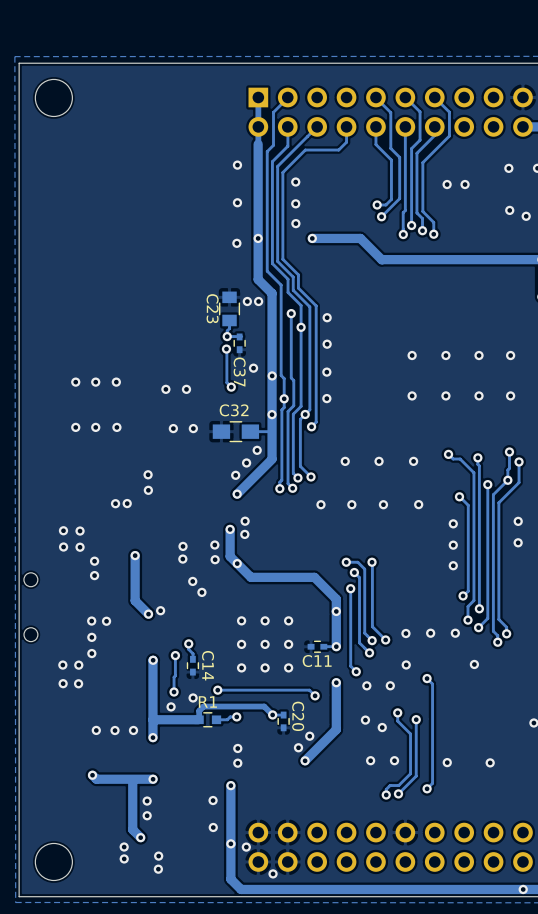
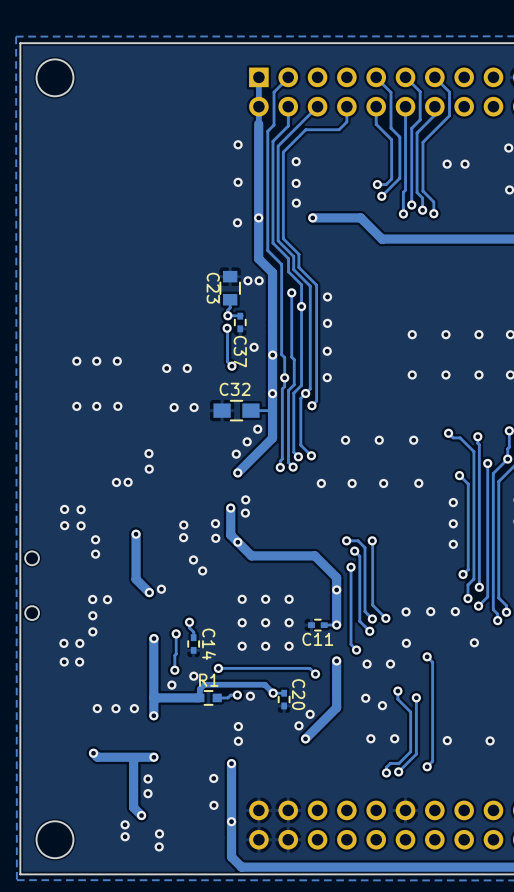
via: none -> (250, 696)
via: (246, 847) -> none
via: (273, 873) -> none

